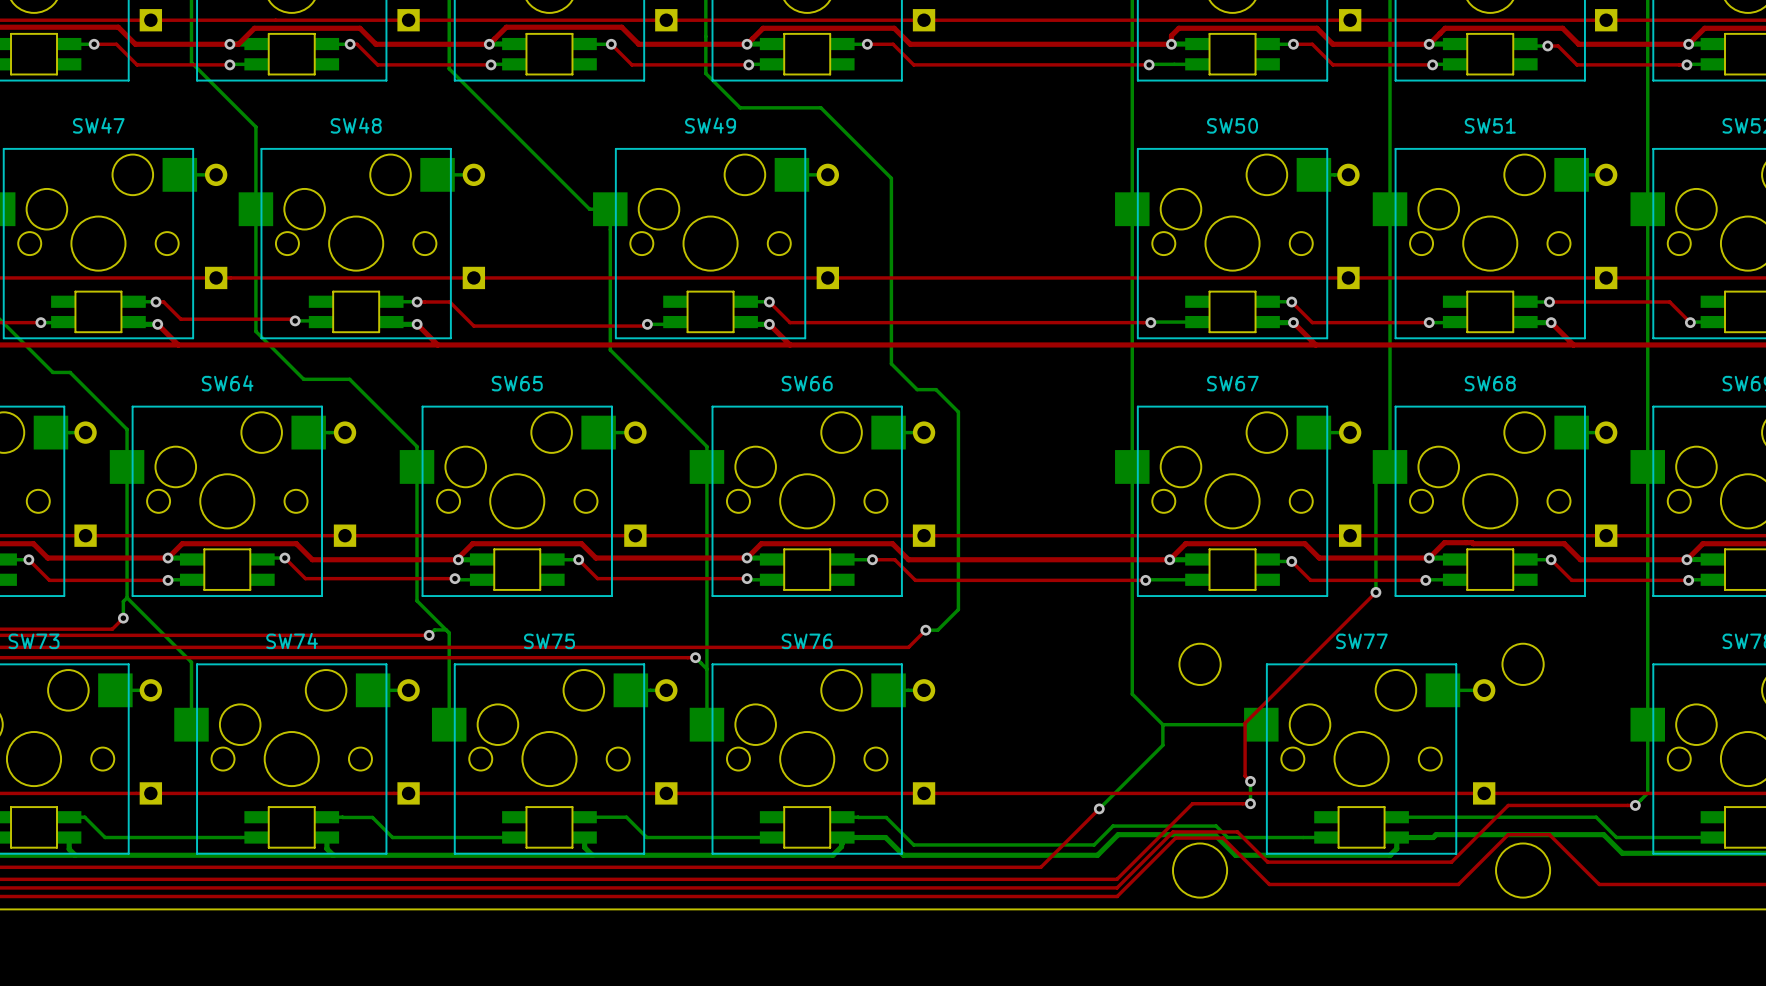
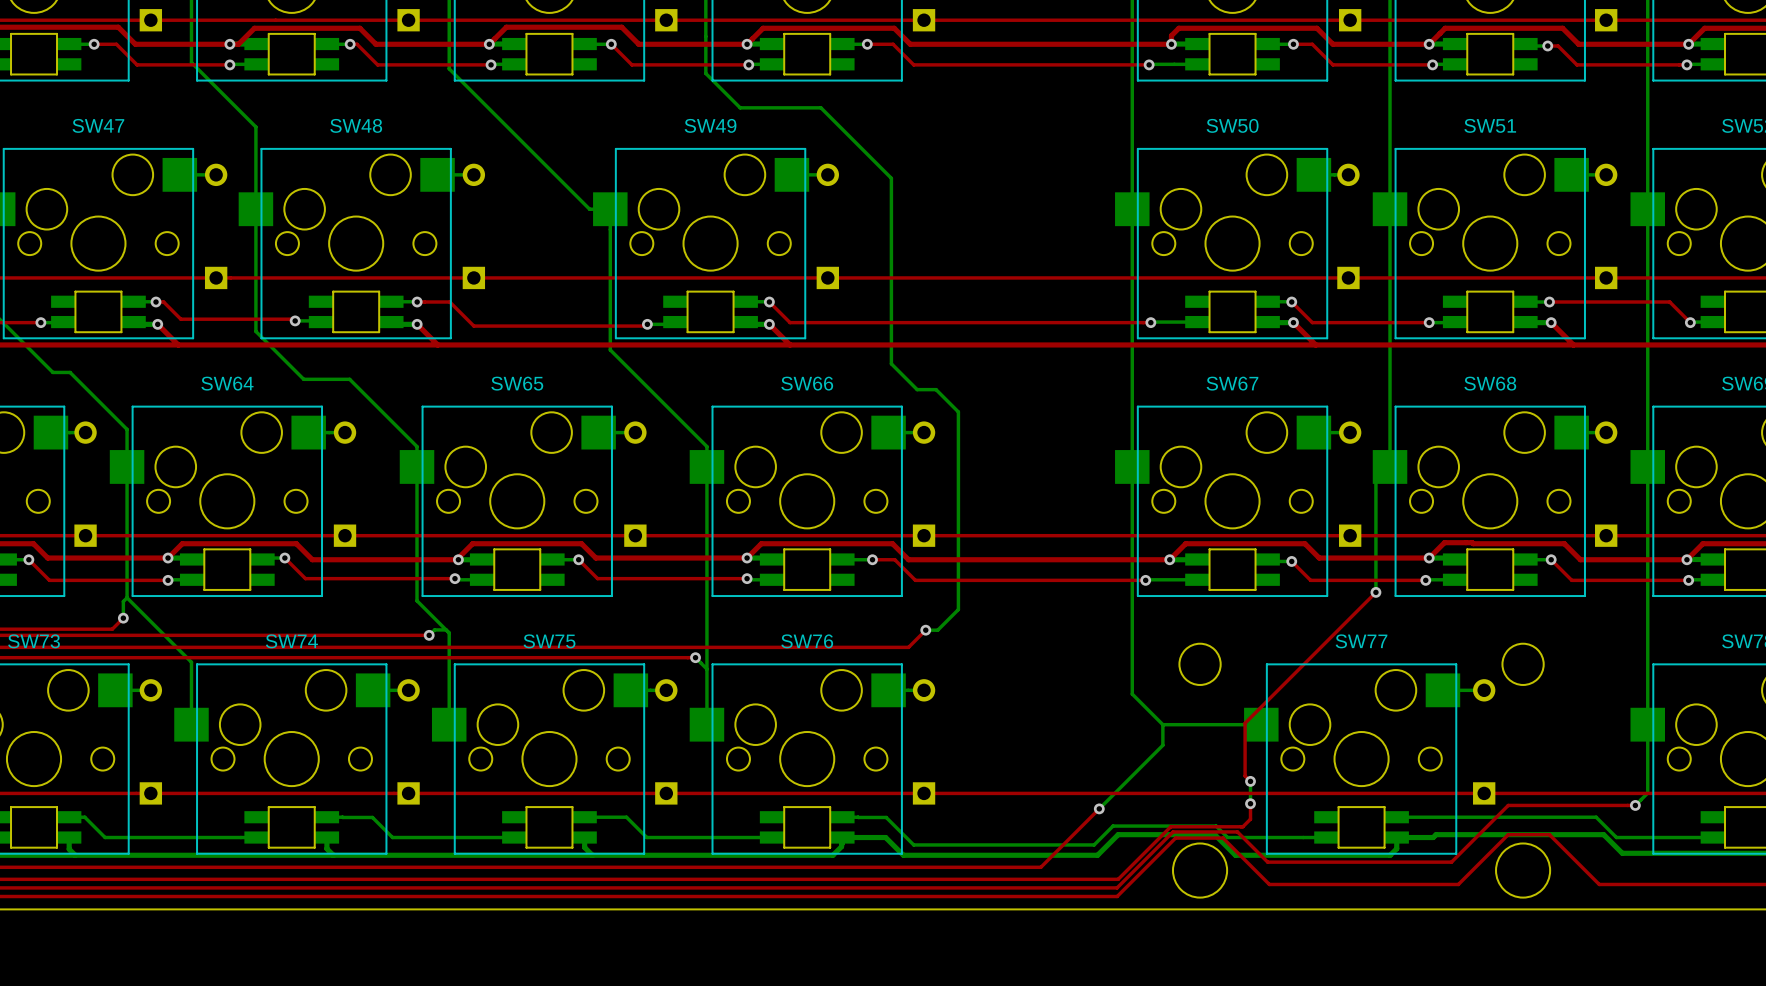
top track: (1250, 803) (1192, 803) (1116, 879) -> (1250, 803) (1250, 819) (1242, 826) (1170, 826) (1116, 879)

